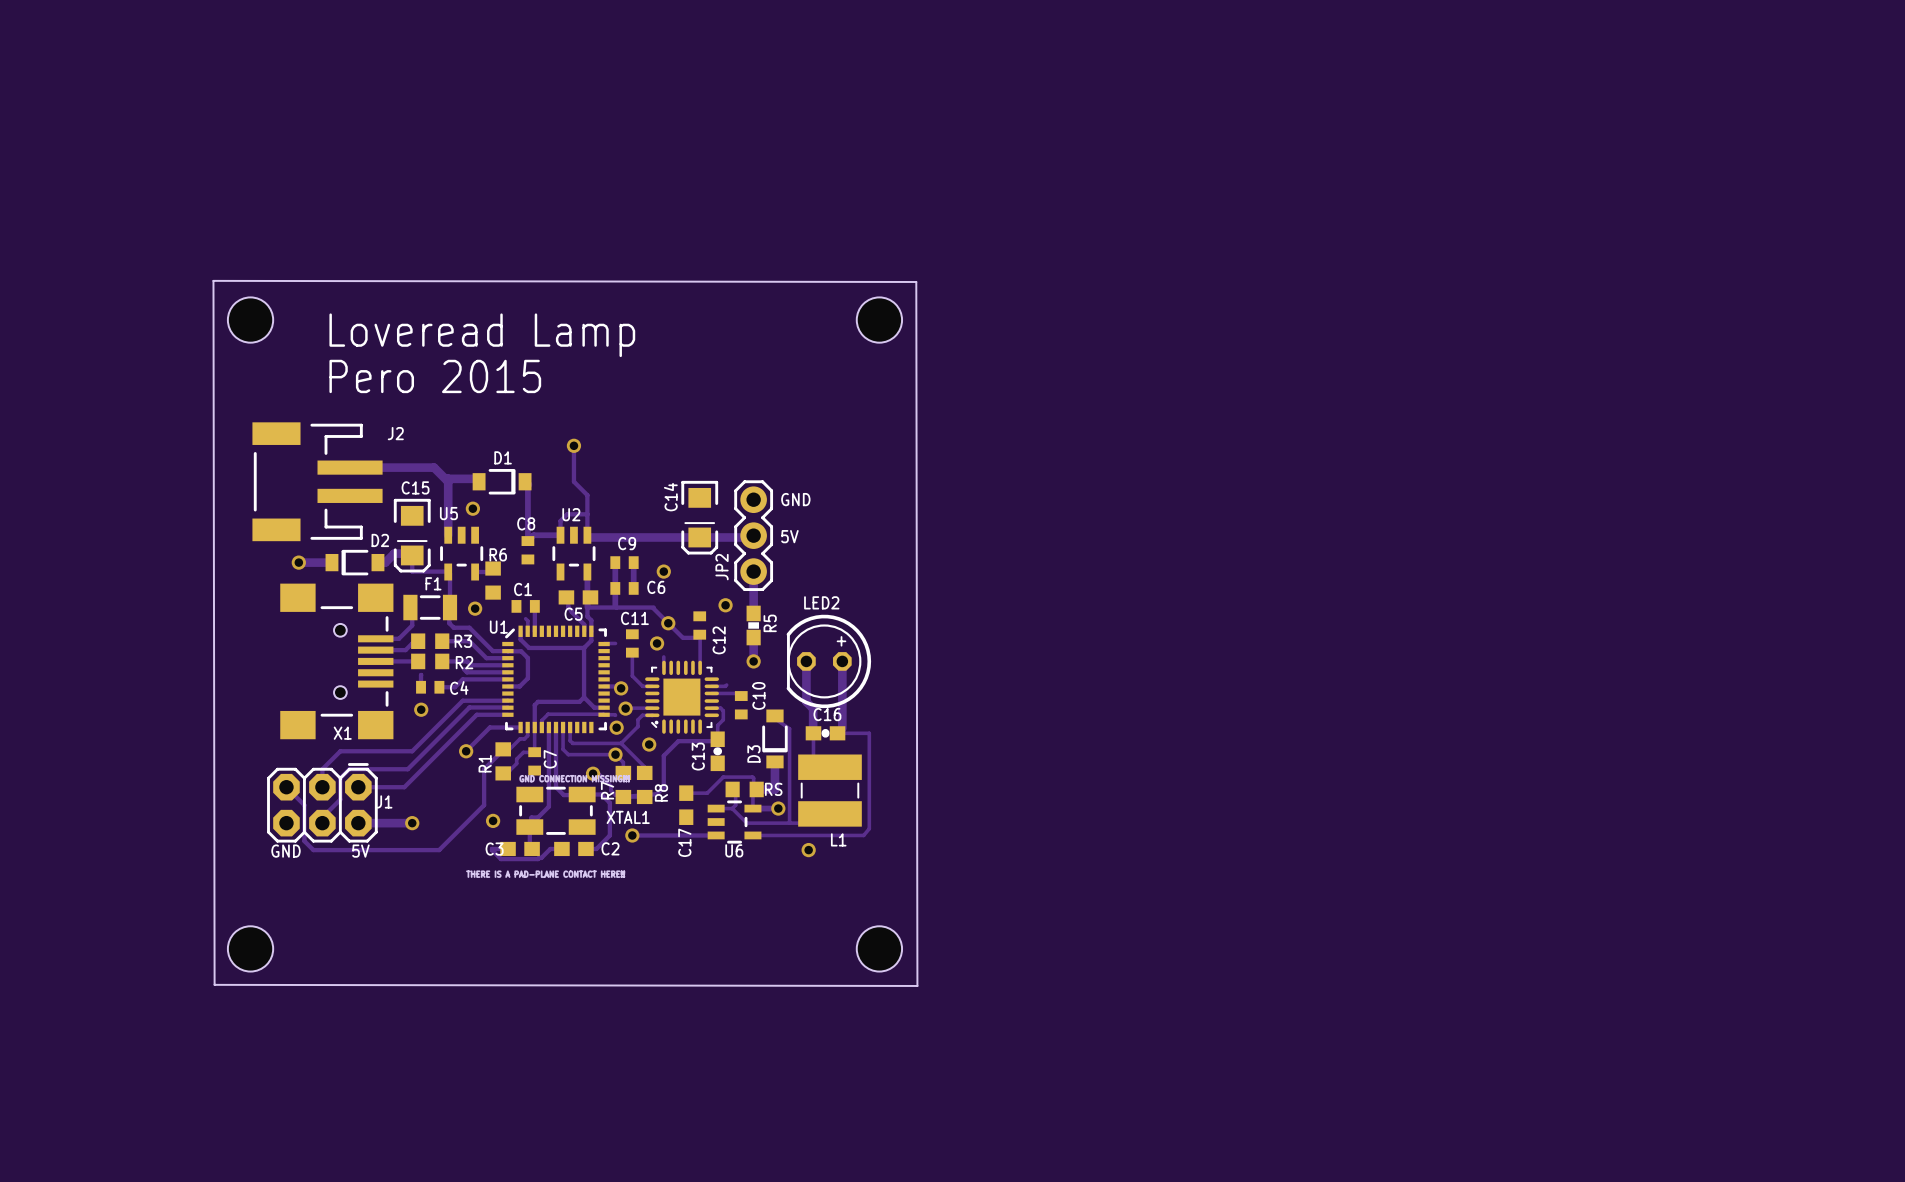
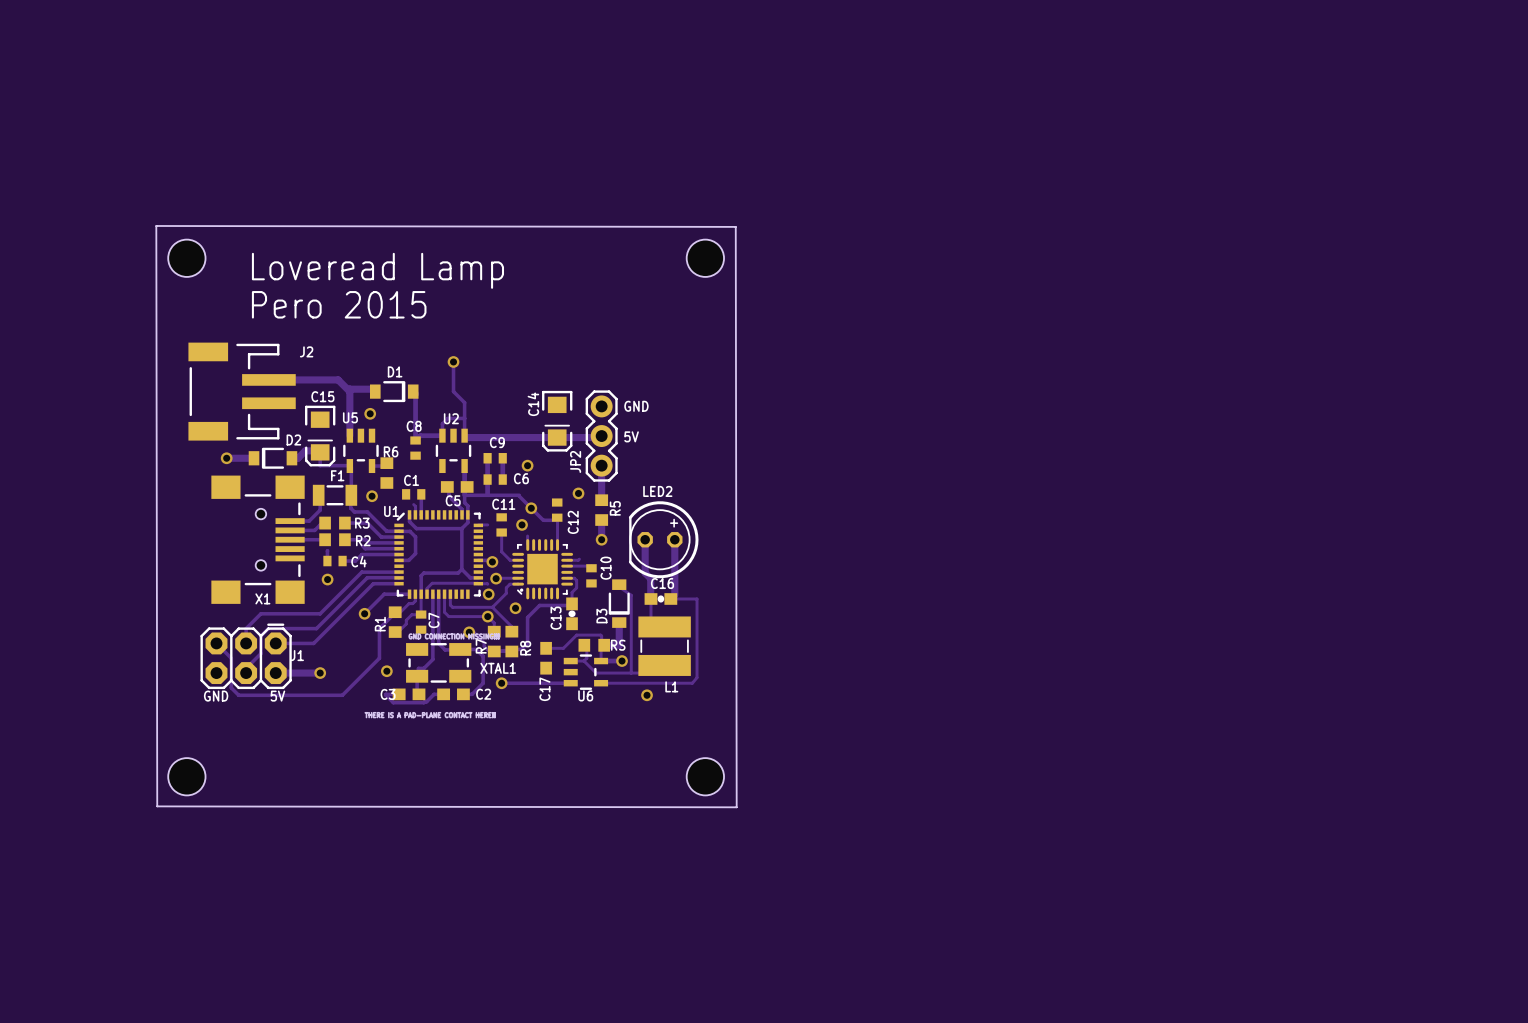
R5 footprint: [746, 605, 761, 646] -> [595, 494, 609, 526]

